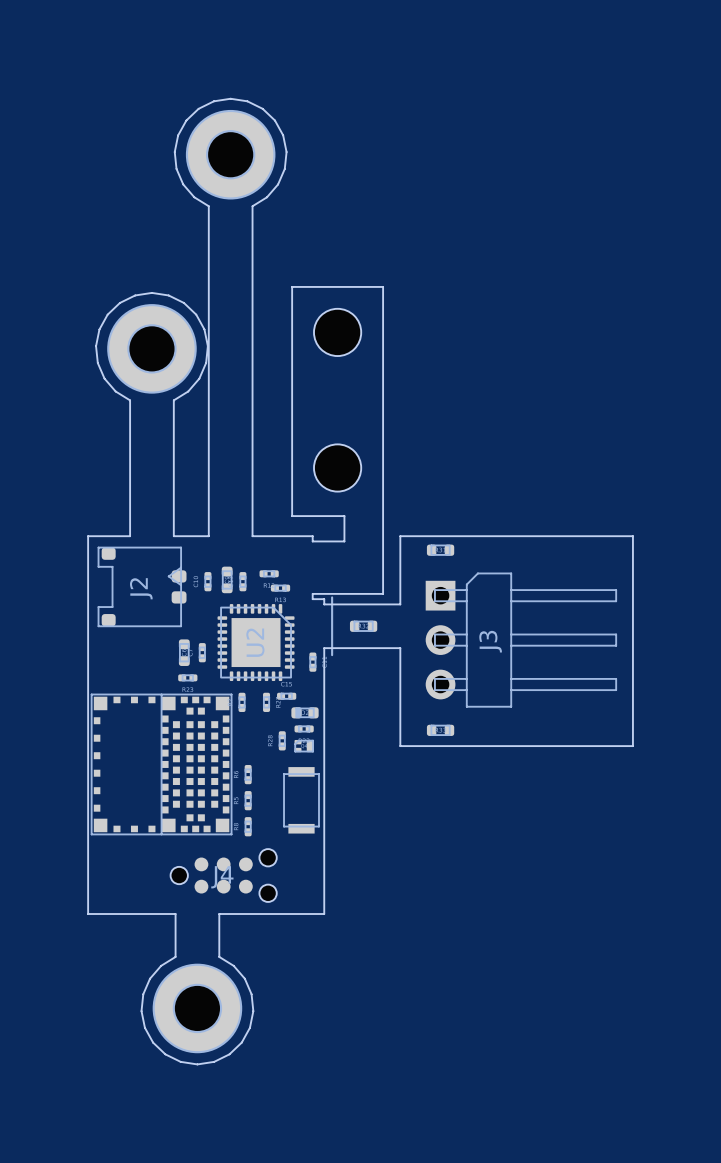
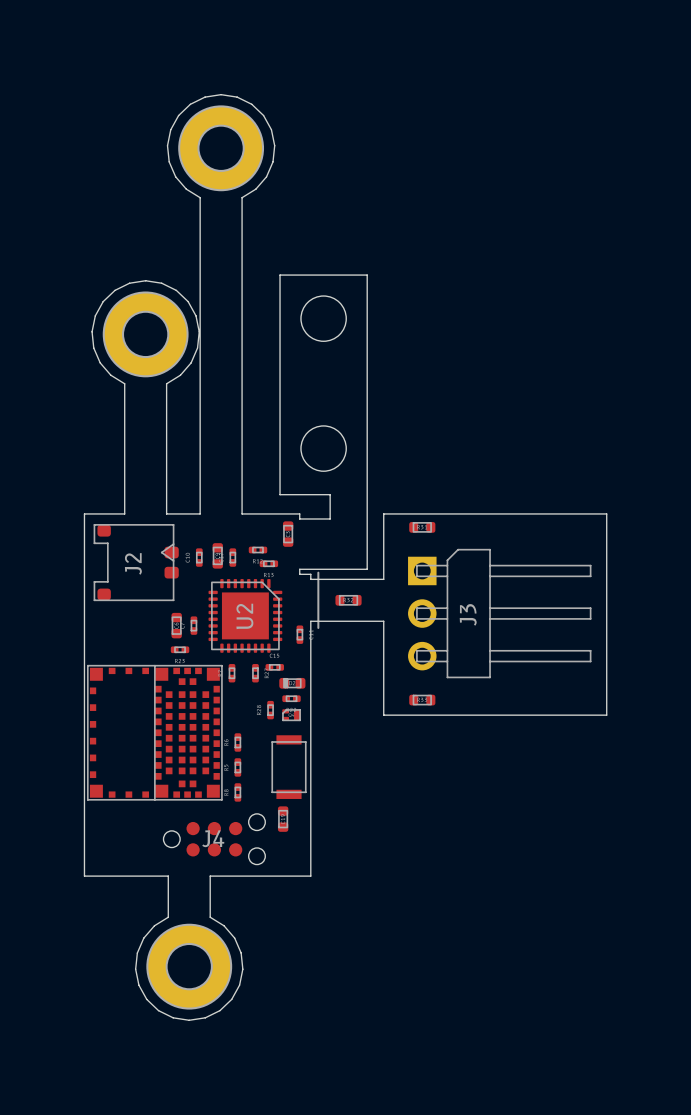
part: none -> (288, 534)
part: none -> (283, 819)

